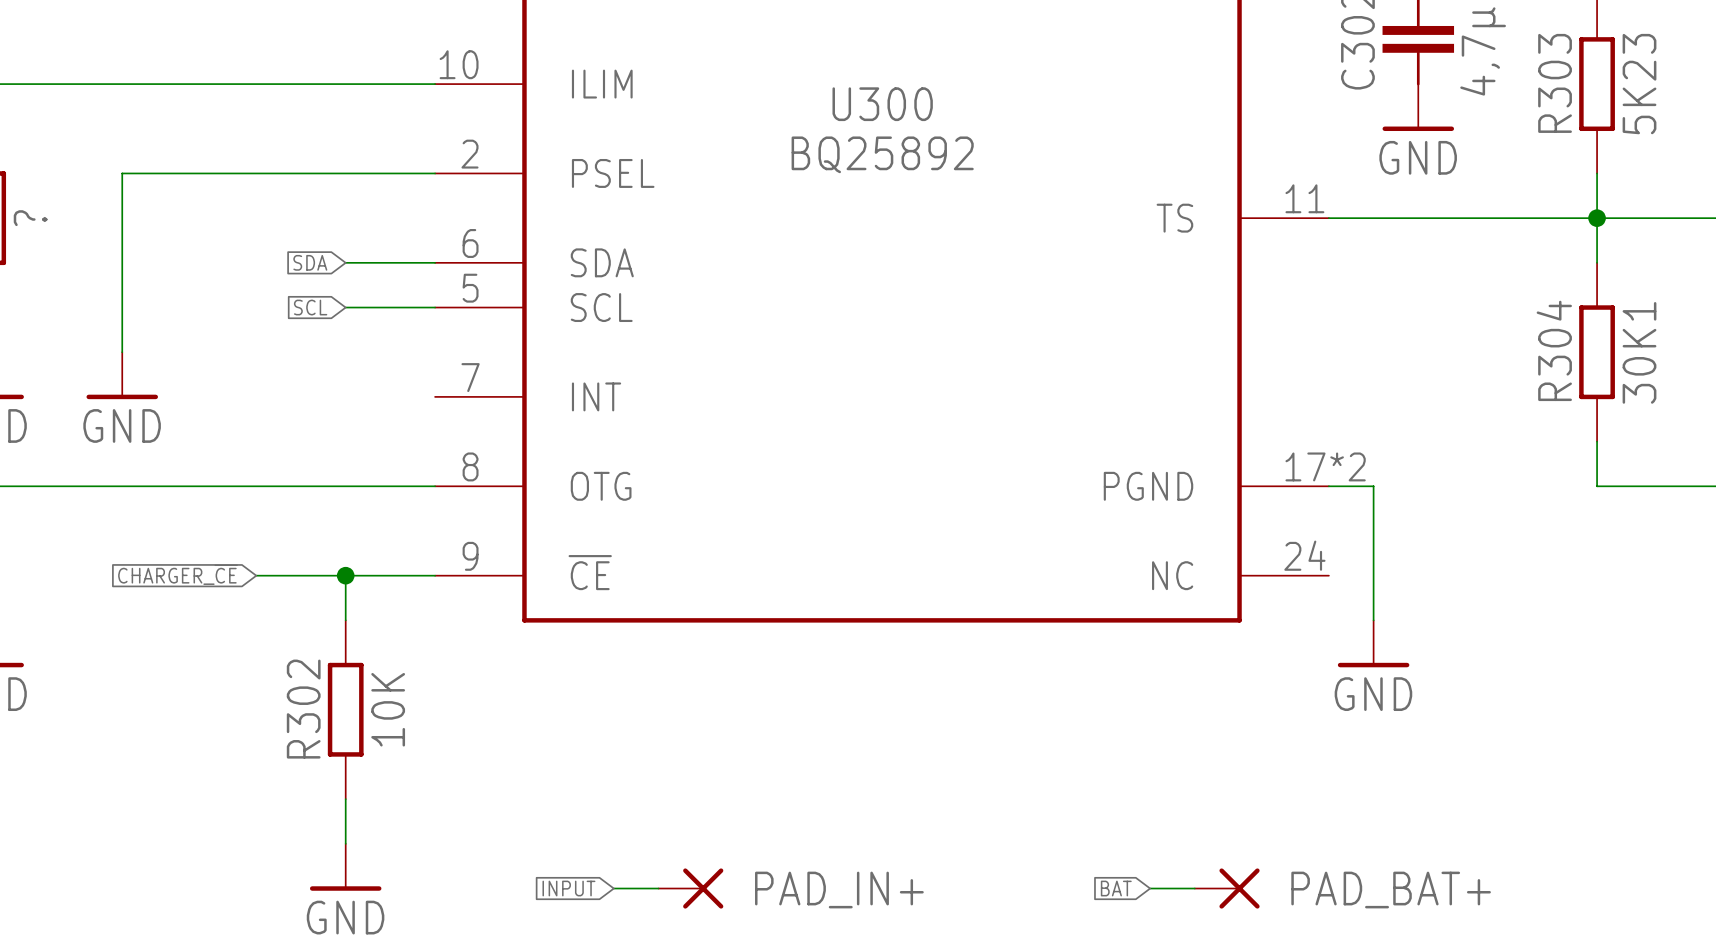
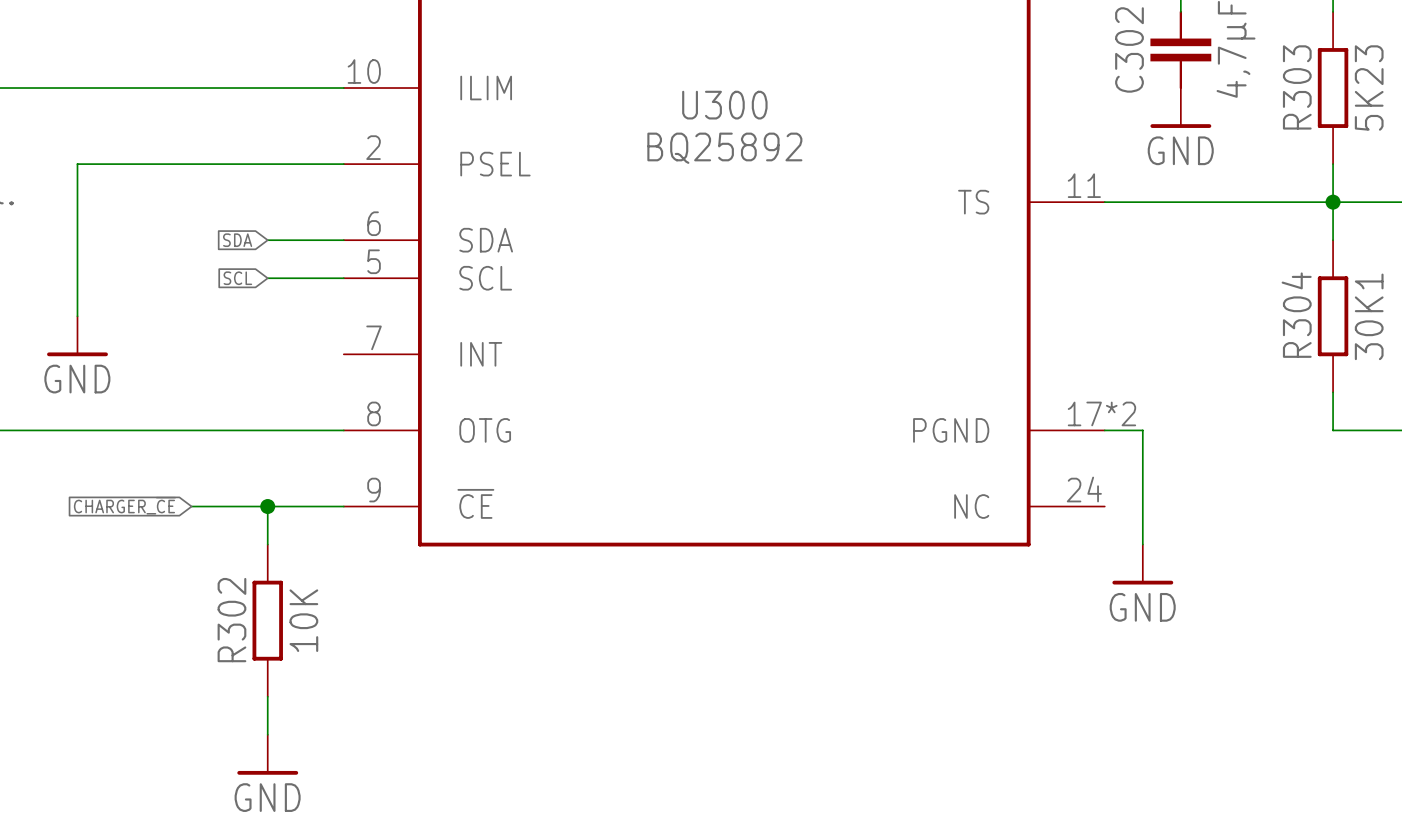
global label: INPUT (568, 888) -> none
wire: (613, 888) (658, 888) -> none
PAD_IN+: (690, 888) -> none
global label: BAT (1116, 888) -> none
wire: (1150, 888) (1194, 888) -> none
PAD_BAT+: (1227, 888) -> none

